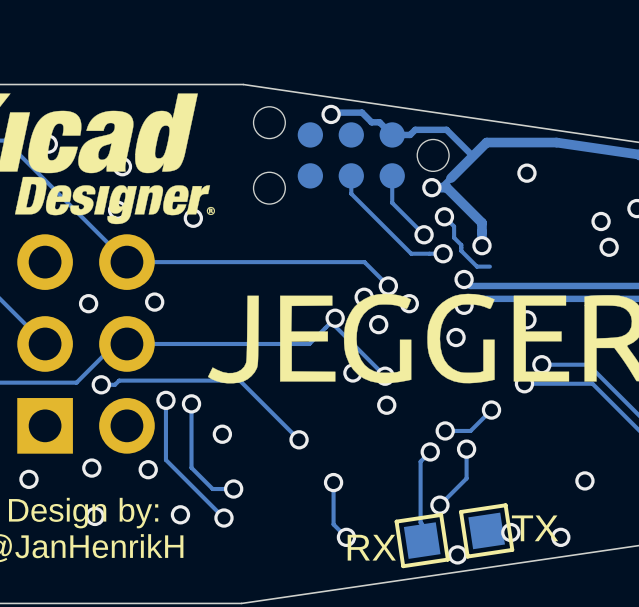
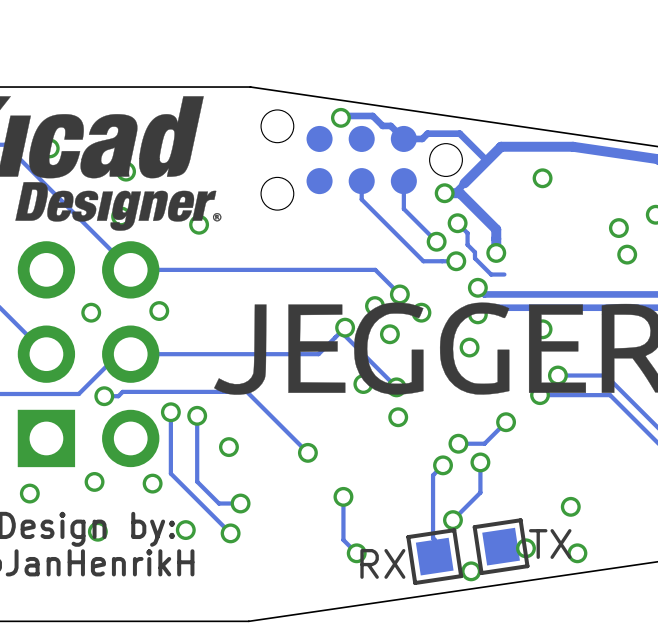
via position: (584, 480) -> (570, 506)

